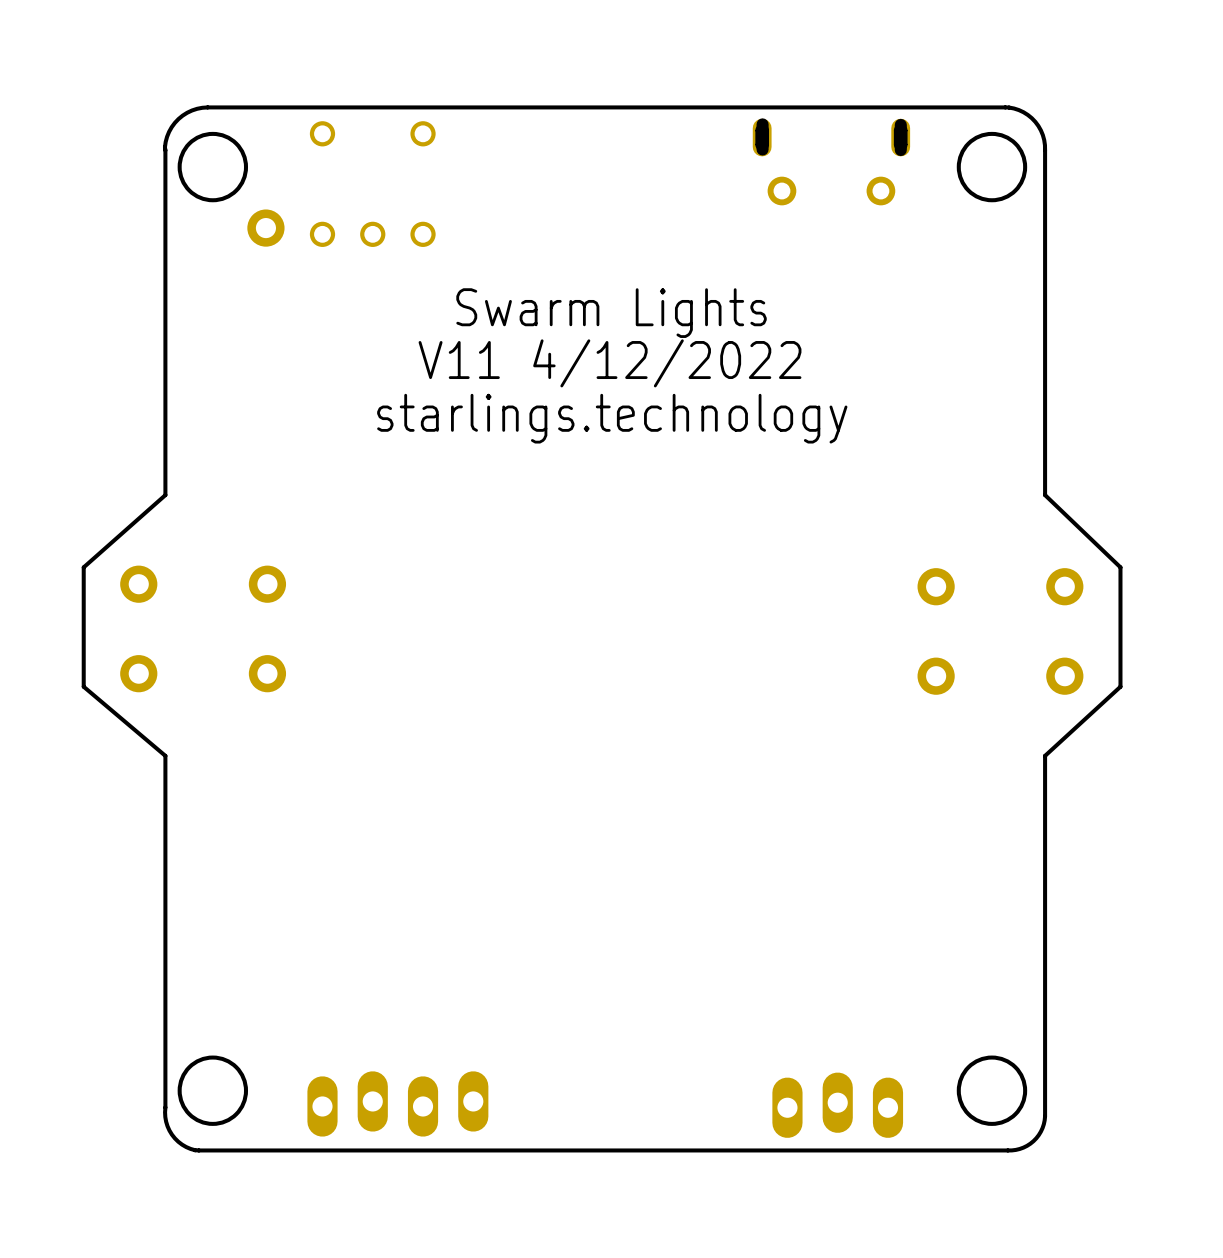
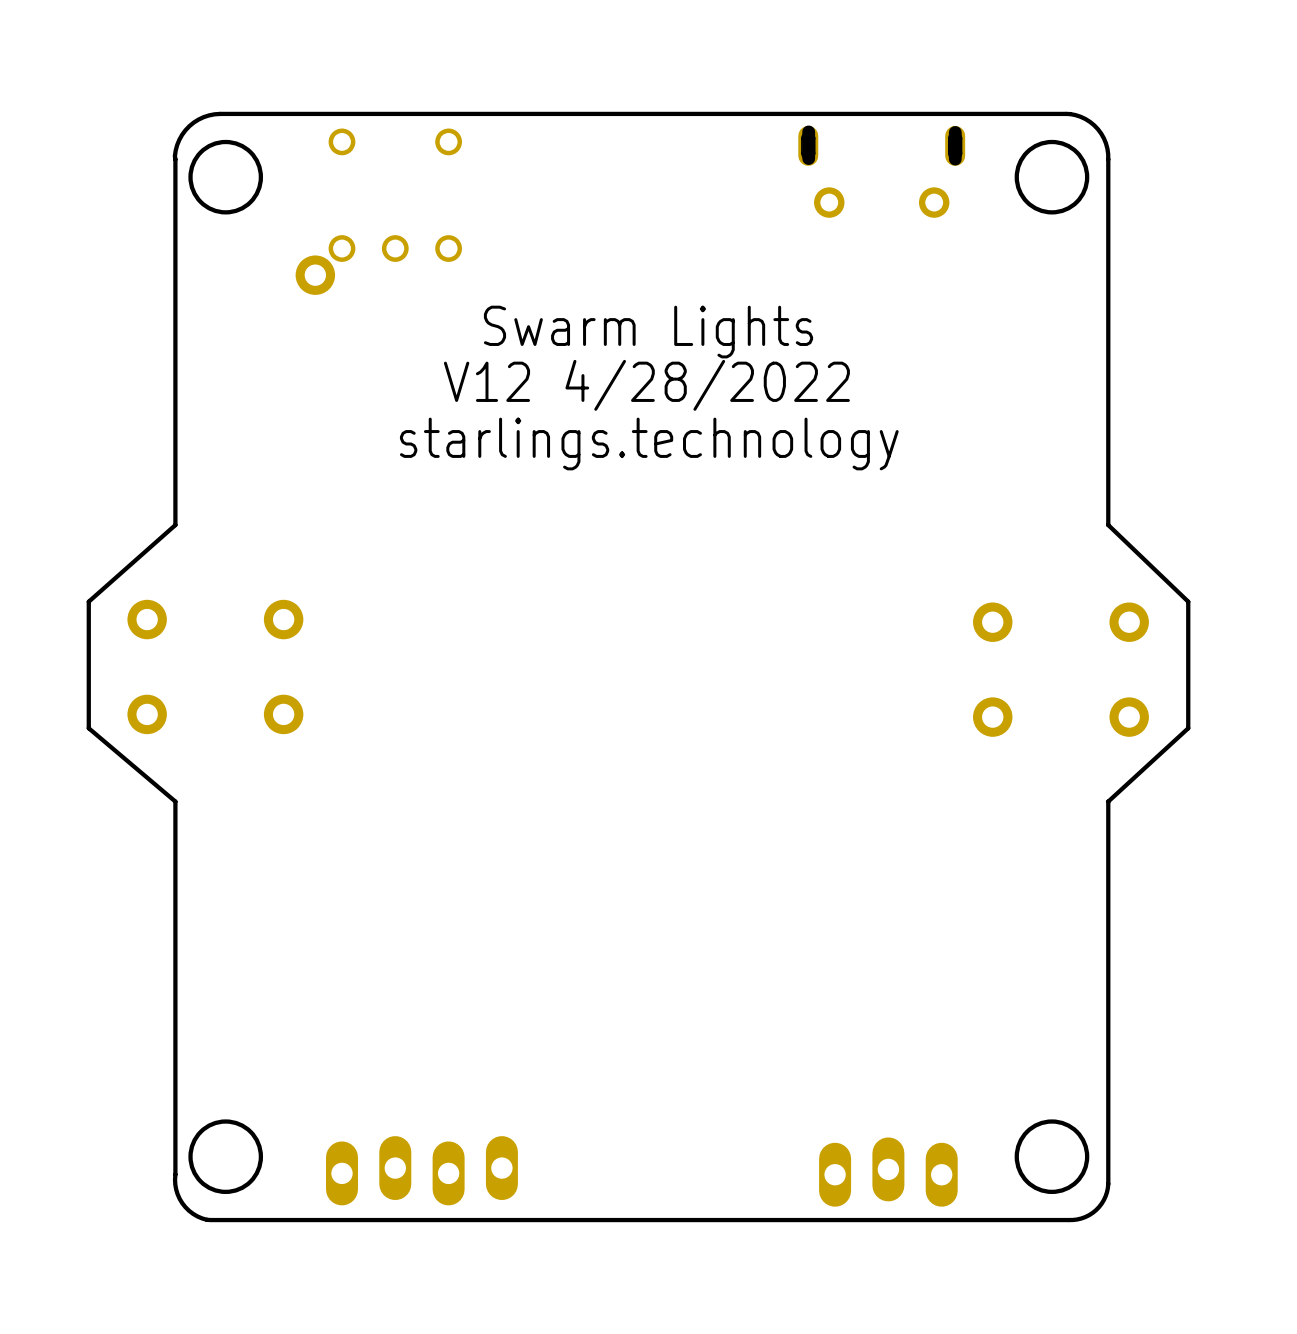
part position: (265, 228) -> (315, 275)
text: V11 4/12/2022 (610, 363) -> V12 4/28/2022 (646, 385)

